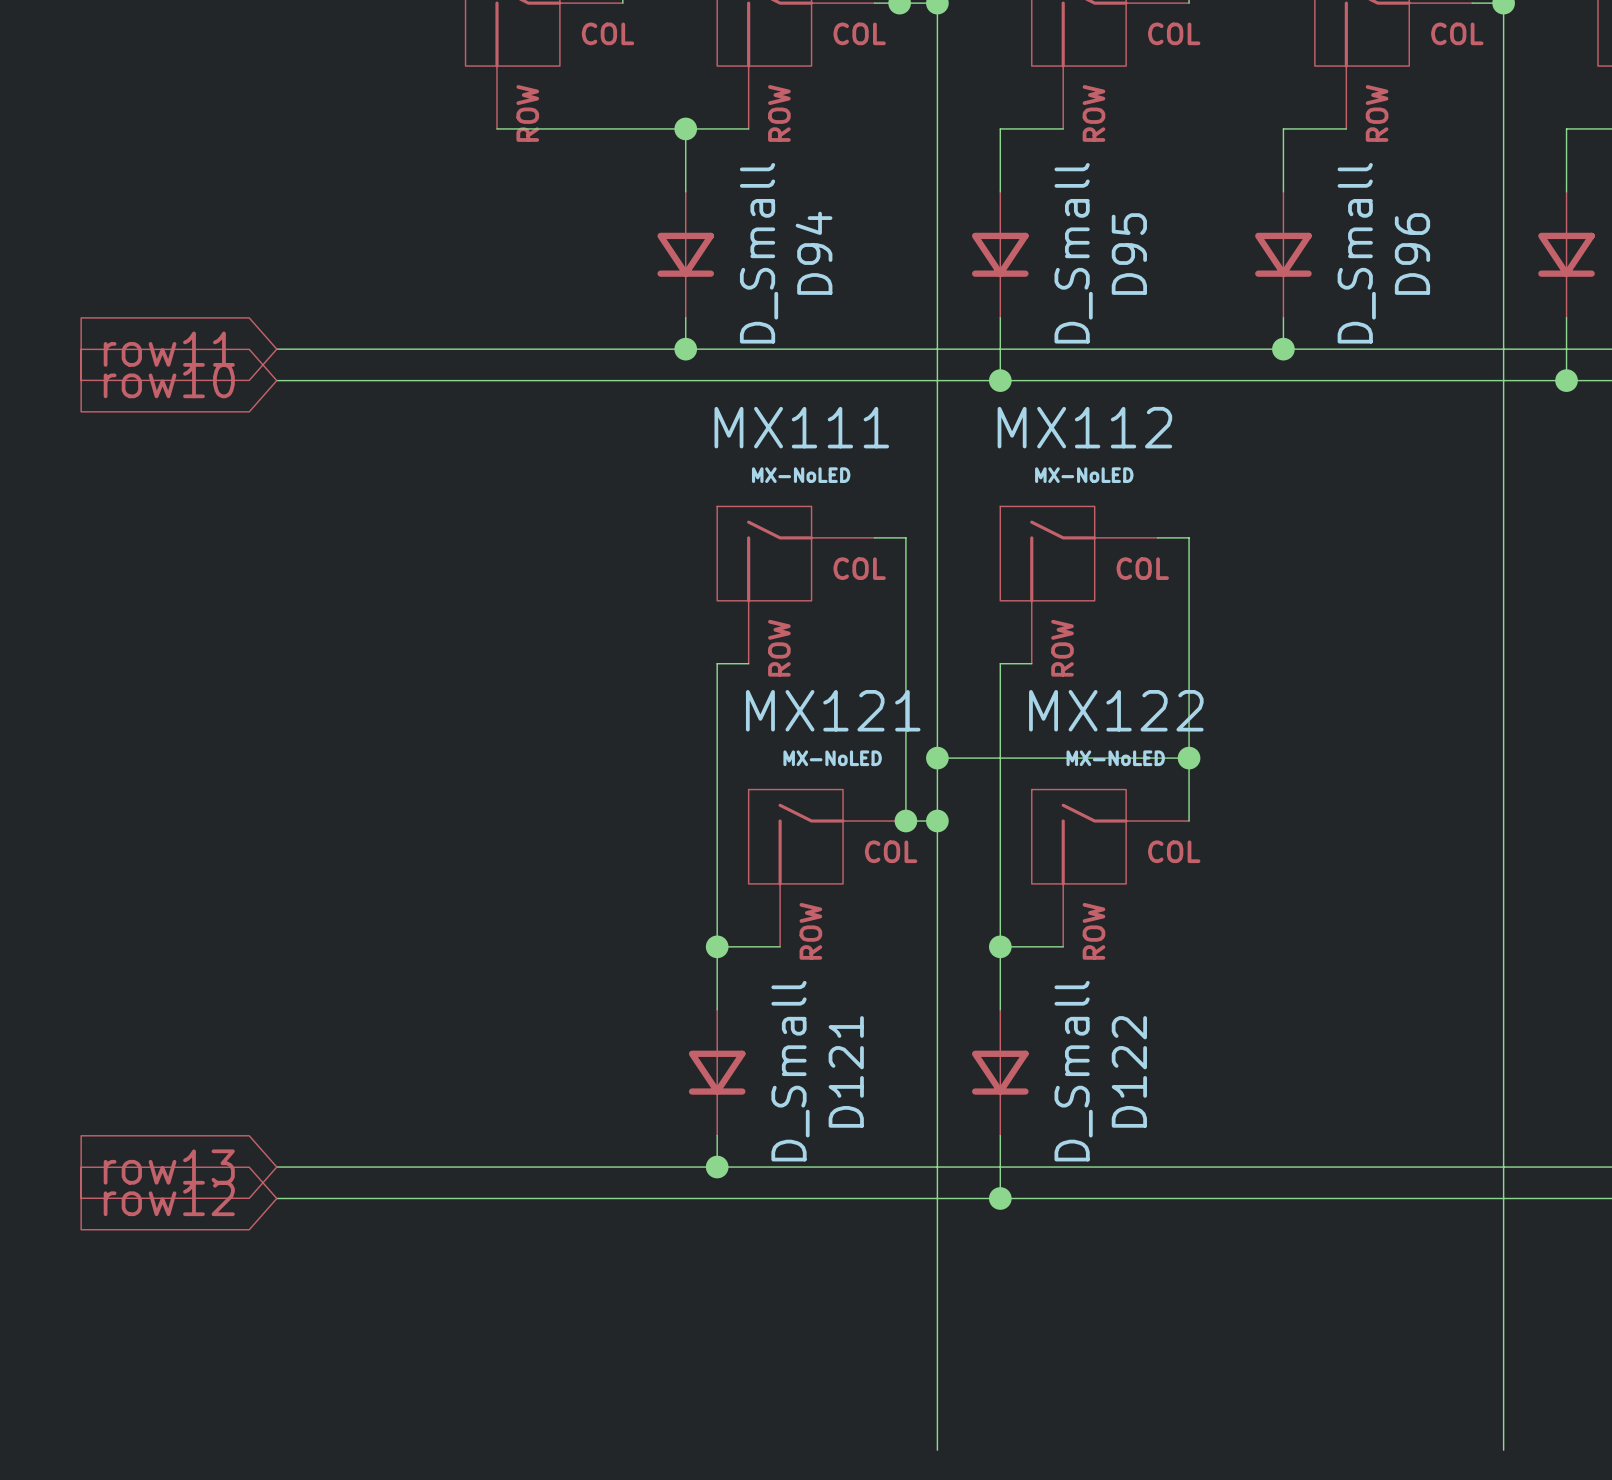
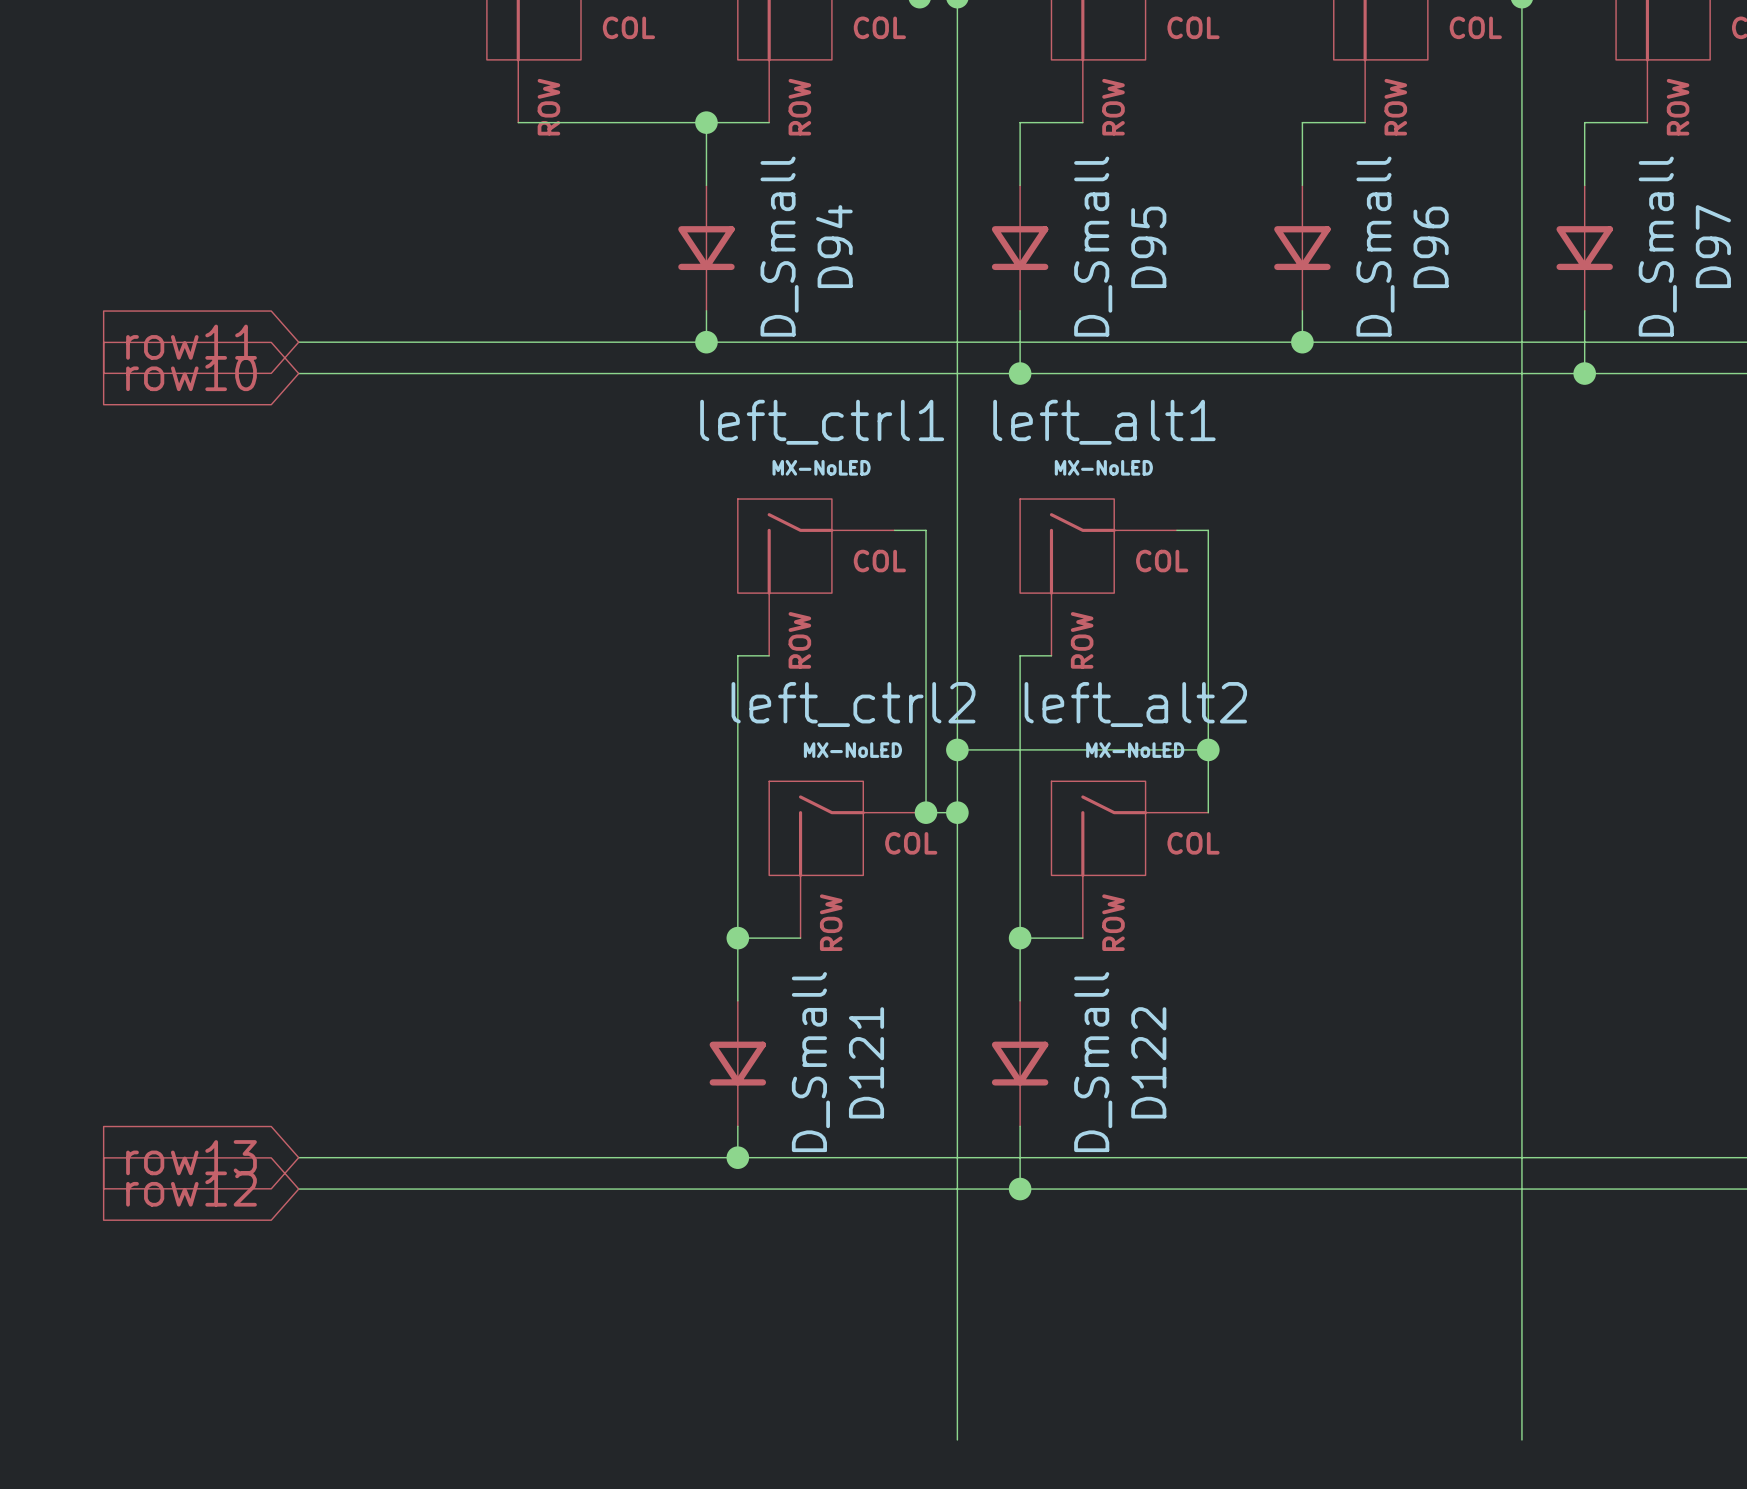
MX111 name: MX111 (801, 427) -> left_ctrl1 (822, 422)
MX112 name: MX112 (1084, 427) -> left_alt1 (1104, 422)
MX121 name: MX121 (833, 710) -> left_ctrl2 (853, 704)
MX122 name: MX122 (1116, 710) -> left_alt2 (1135, 704)

